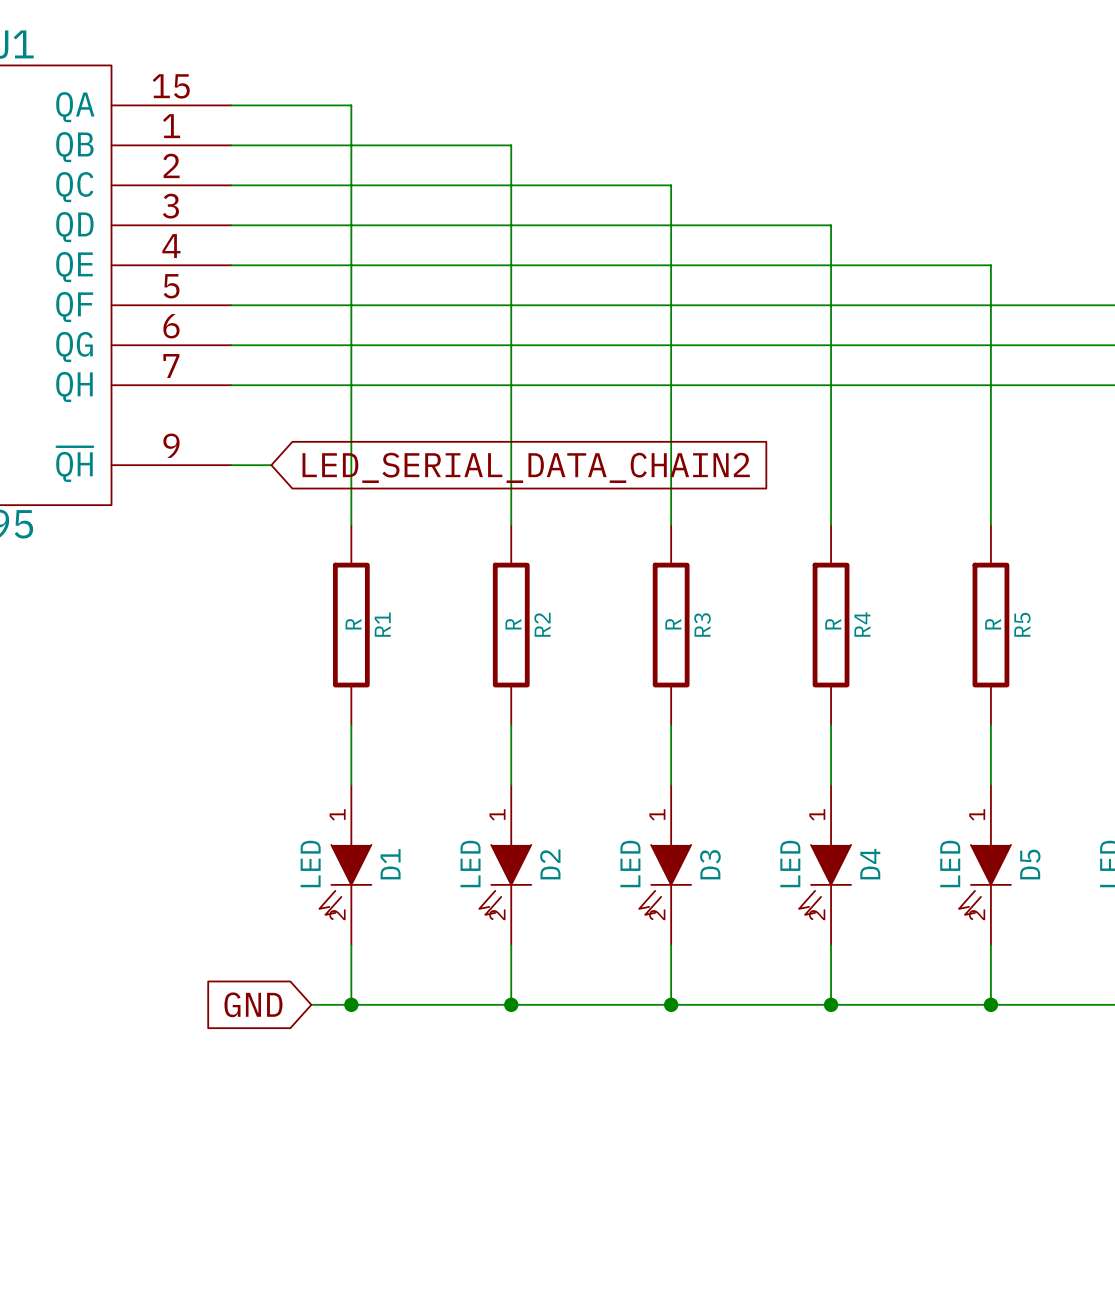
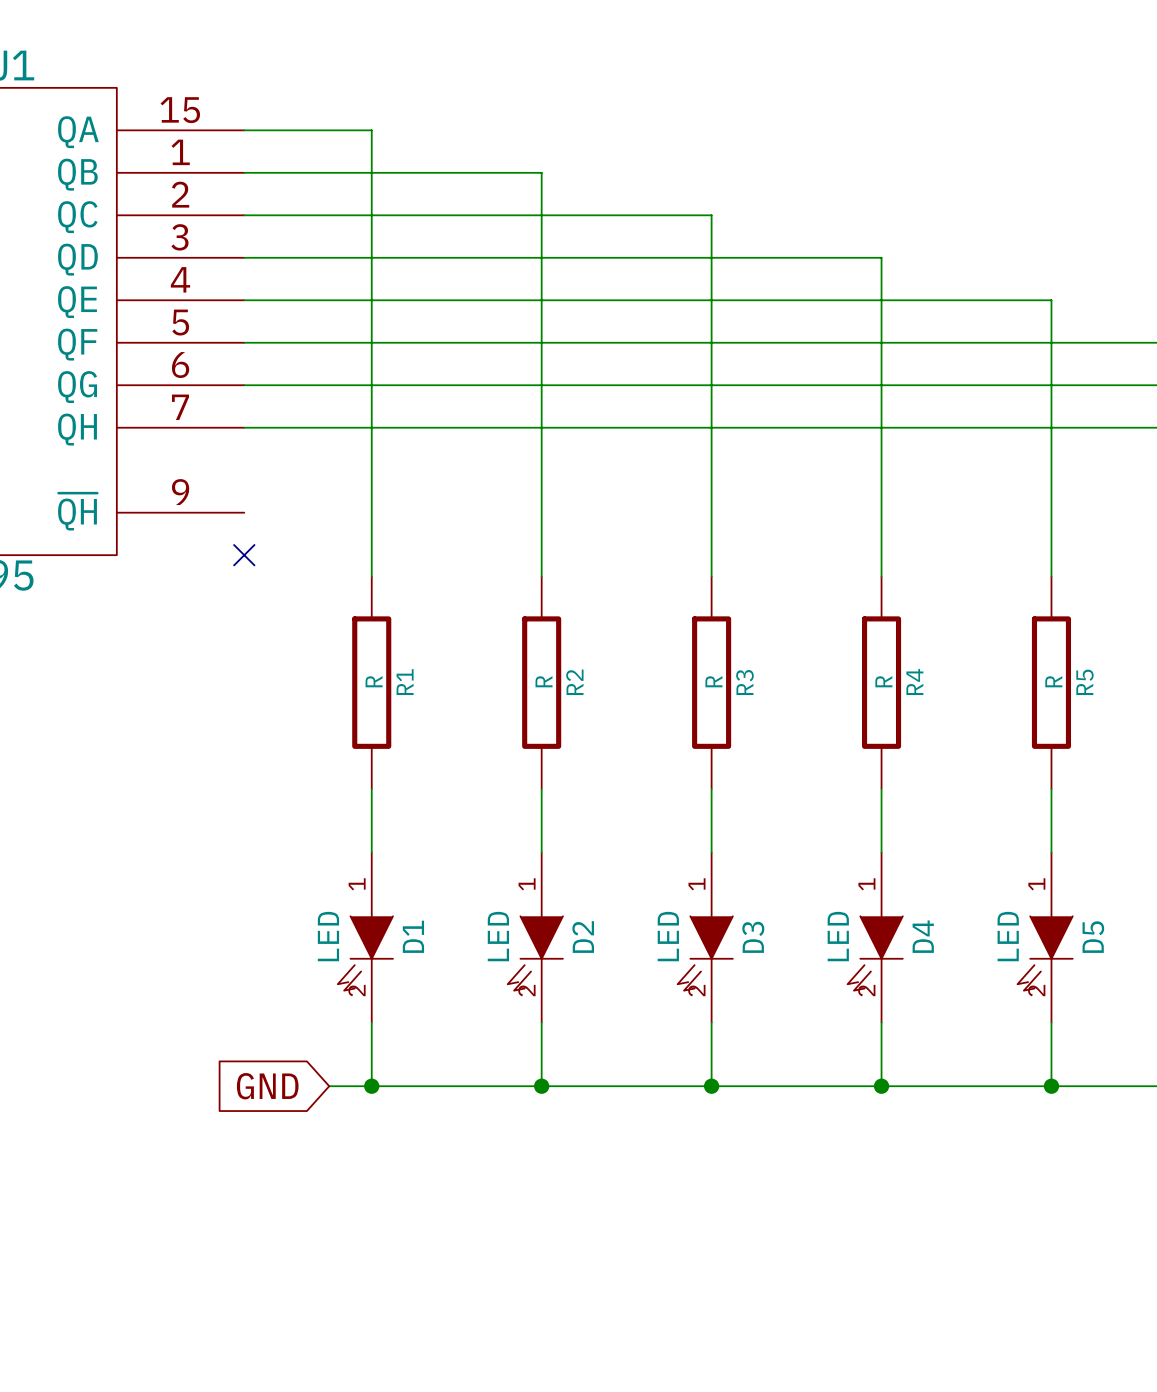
wire: (231, 465) (271, 465) -> none
global label: LED_SERIAL_DATA_CHAIN2 (526, 467) -> none
no-connect mark: none -> (244, 555)

